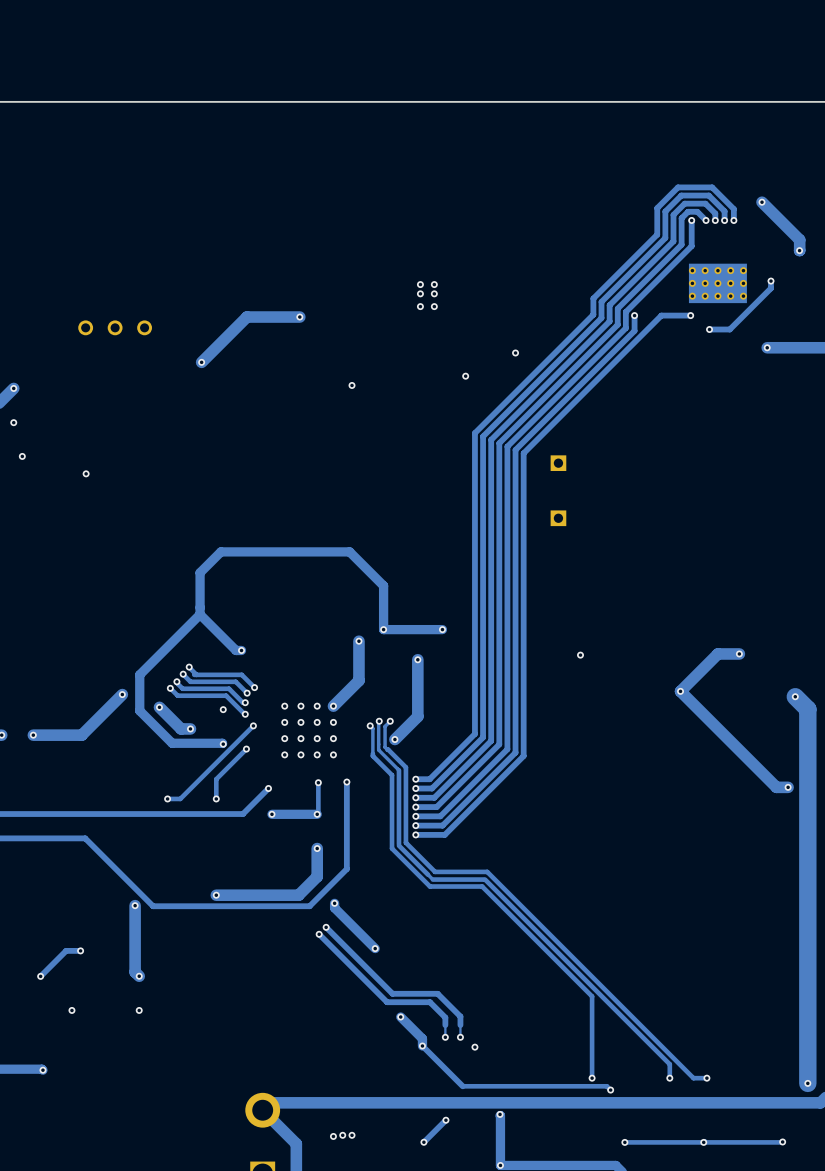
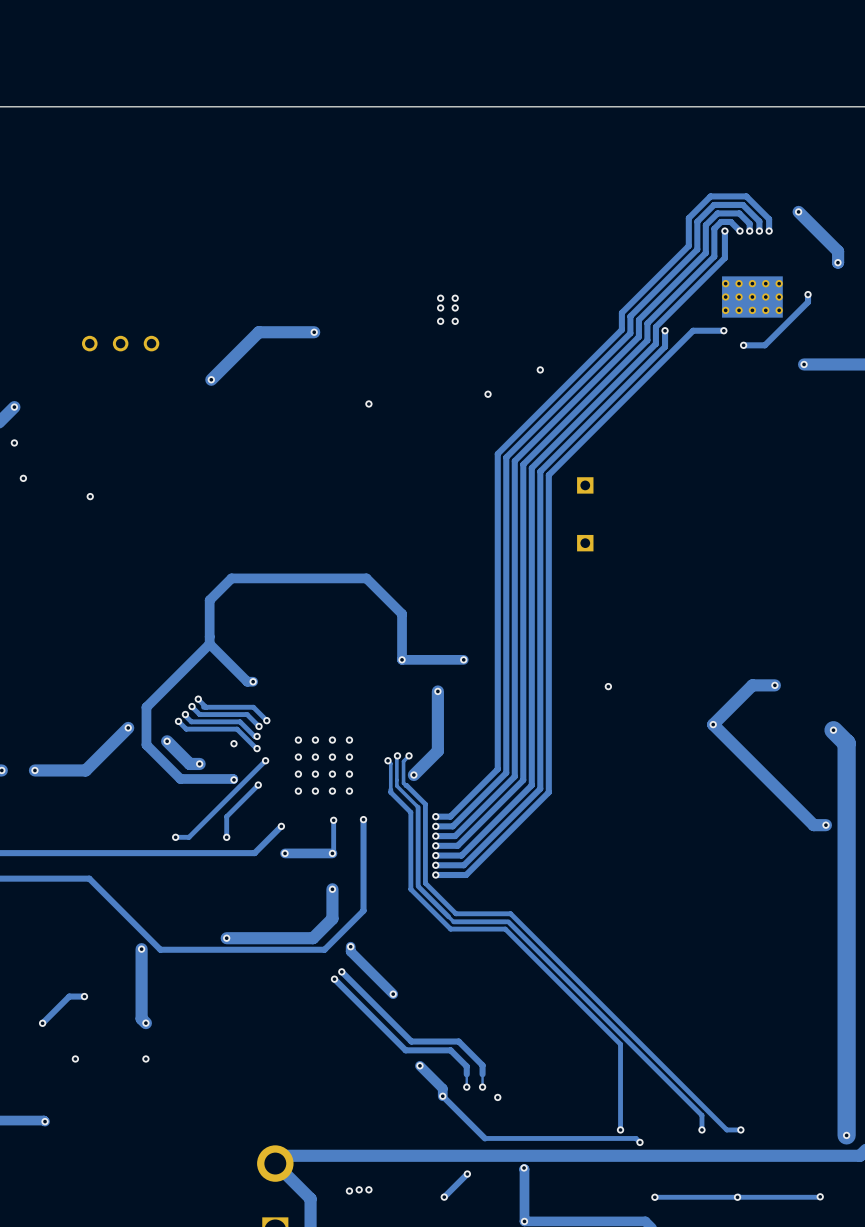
track: (358, 641) (358, 680) (333, 706) -> none
via: (358, 641) -> none

